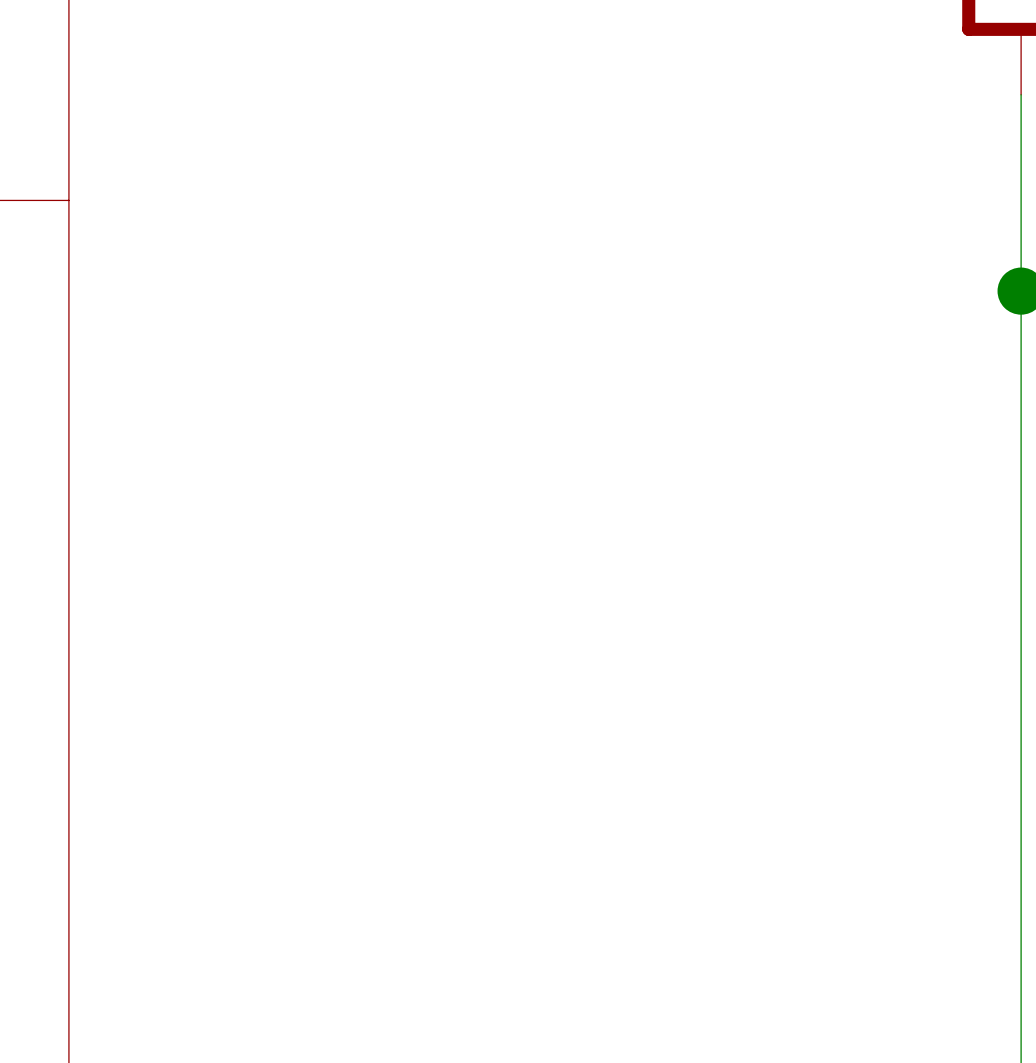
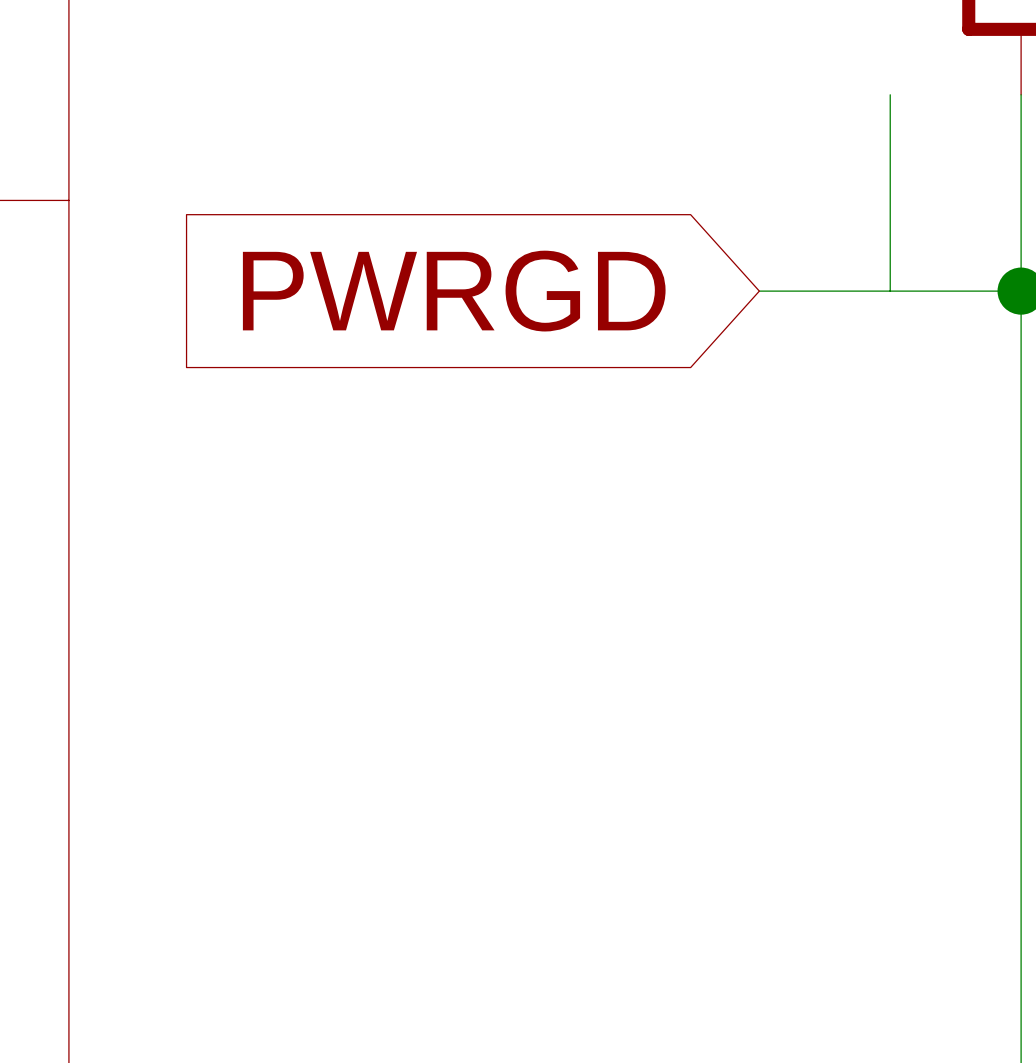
wire: none -> (890, 94) (890, 291)
global label: none -> PWRGD (454, 291)
wire: none -> (759, 291) (1021, 291)

